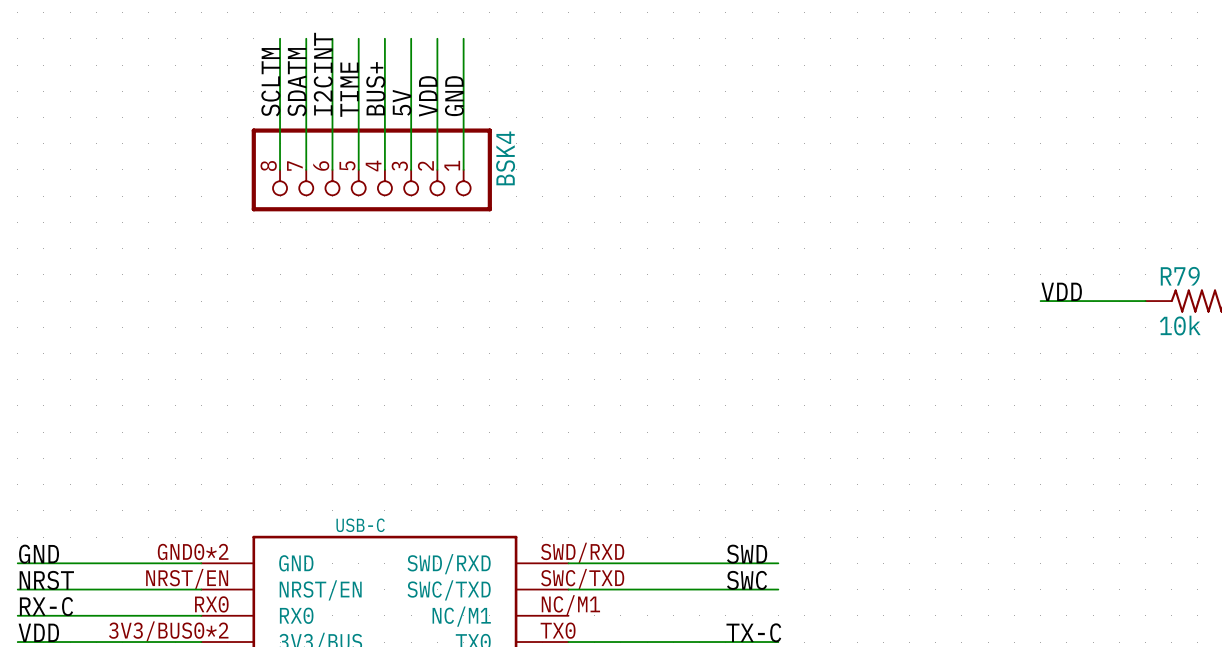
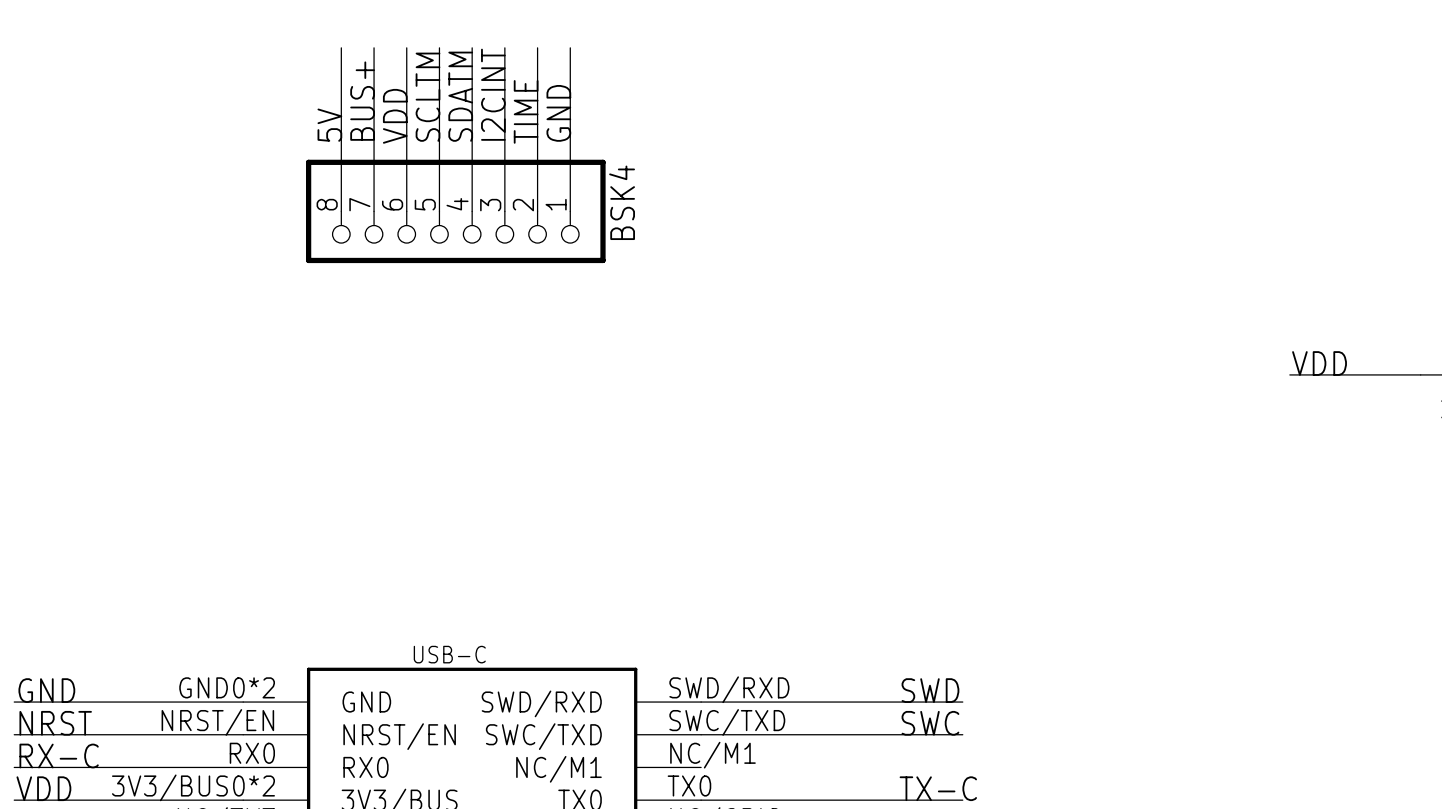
label: I2CINT (323, 74) -> VDD (395, 116)
label: SCLTM (270, 82) -> 5V (329, 125)
label: SDATM (297, 82) -> BUS+ (362, 101)
label: BUS+ (375, 88) -> SDATM (460, 96)
label: TIME (349, 89) -> SCLTM (428, 97)
label: VDD (428, 96) -> TIME (526, 111)
label: 5V (402, 102) -> I2CINT (493, 94)

